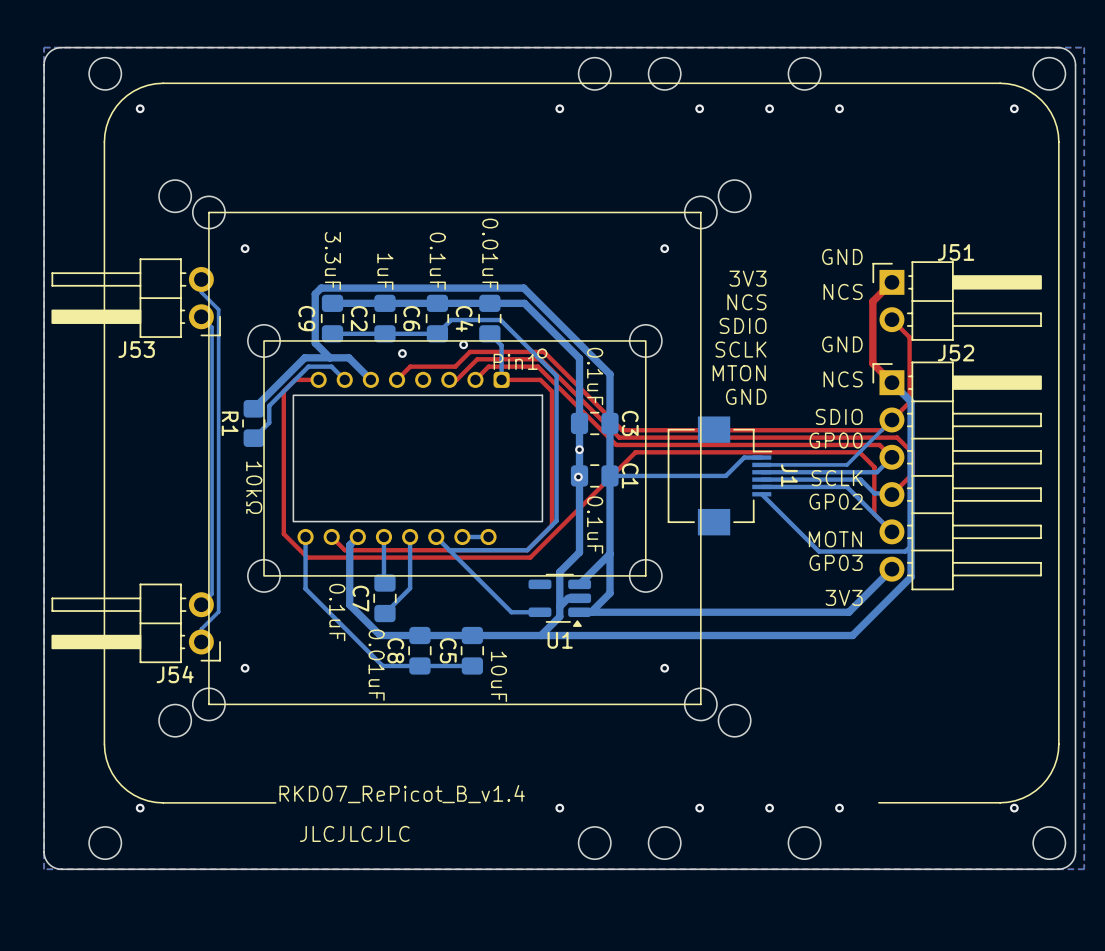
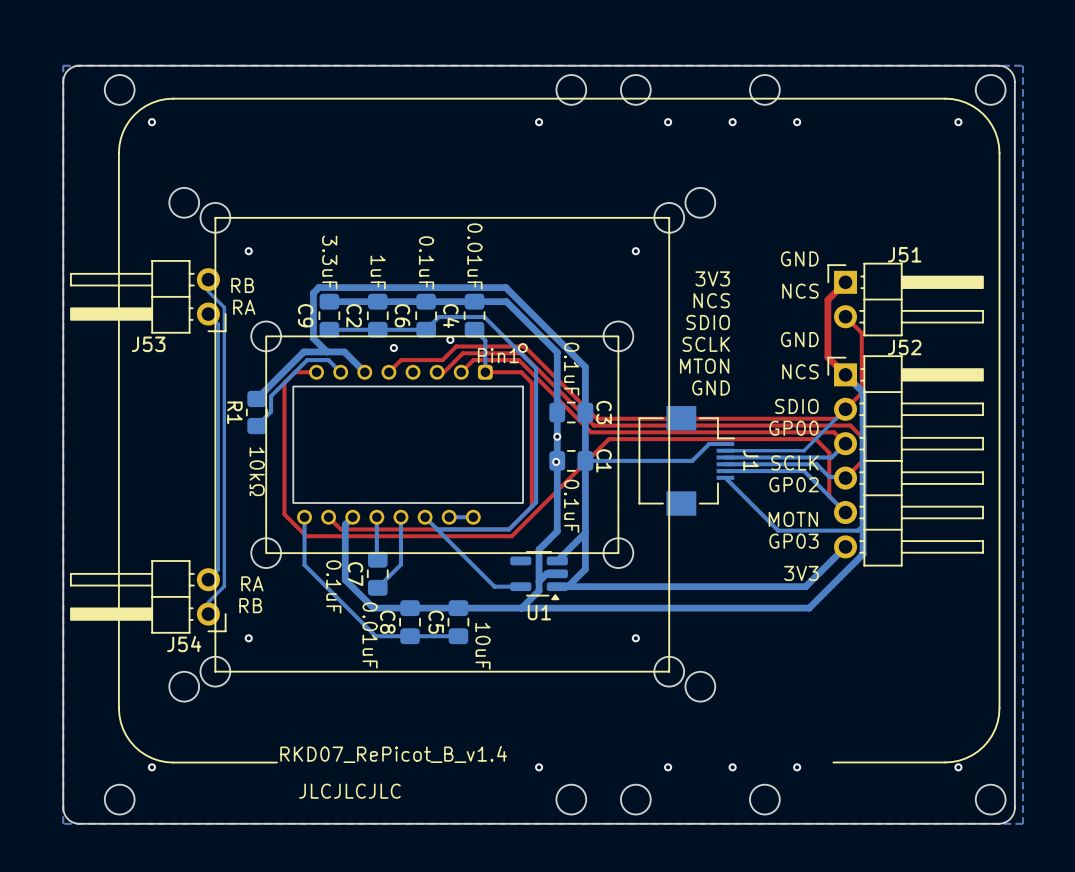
text: none -> RB (242, 285)
text: none -> RA (244, 307)
text: none -> RA (252, 583)
text: none -> RB (250, 605)

